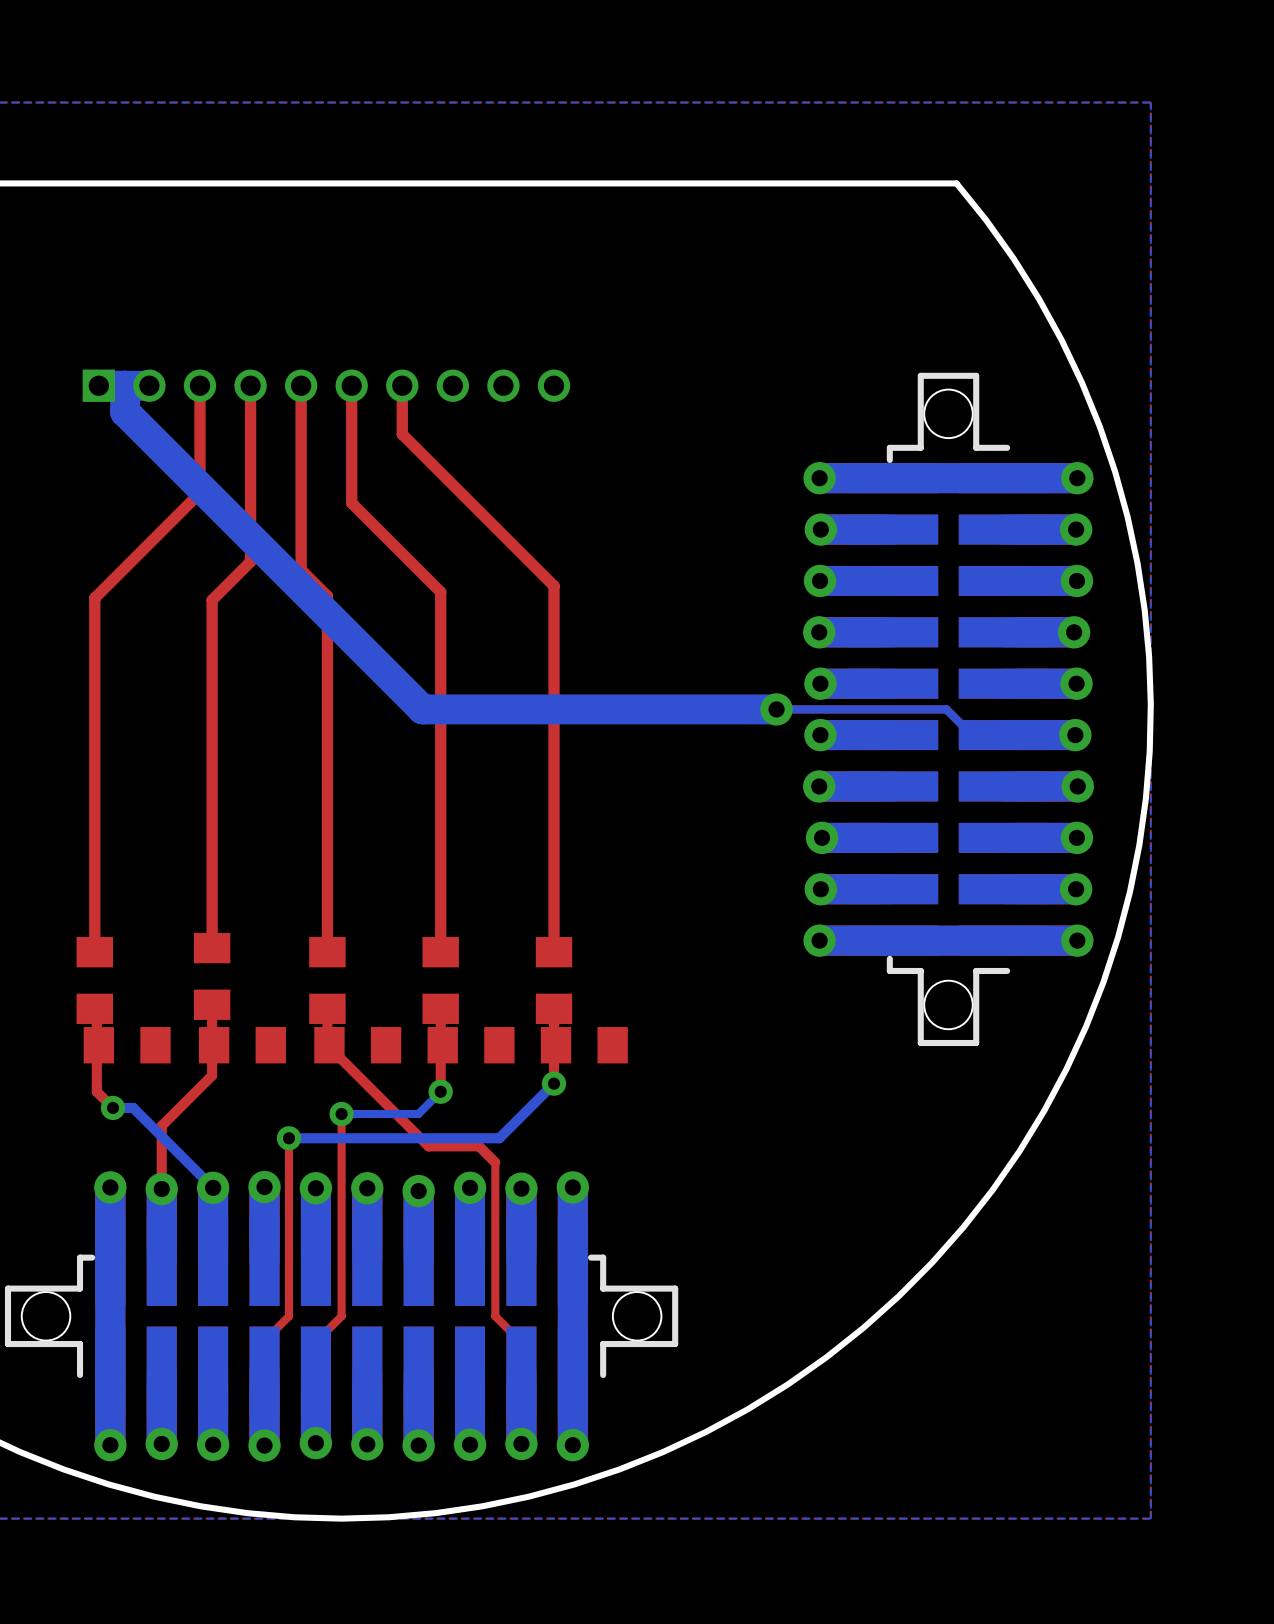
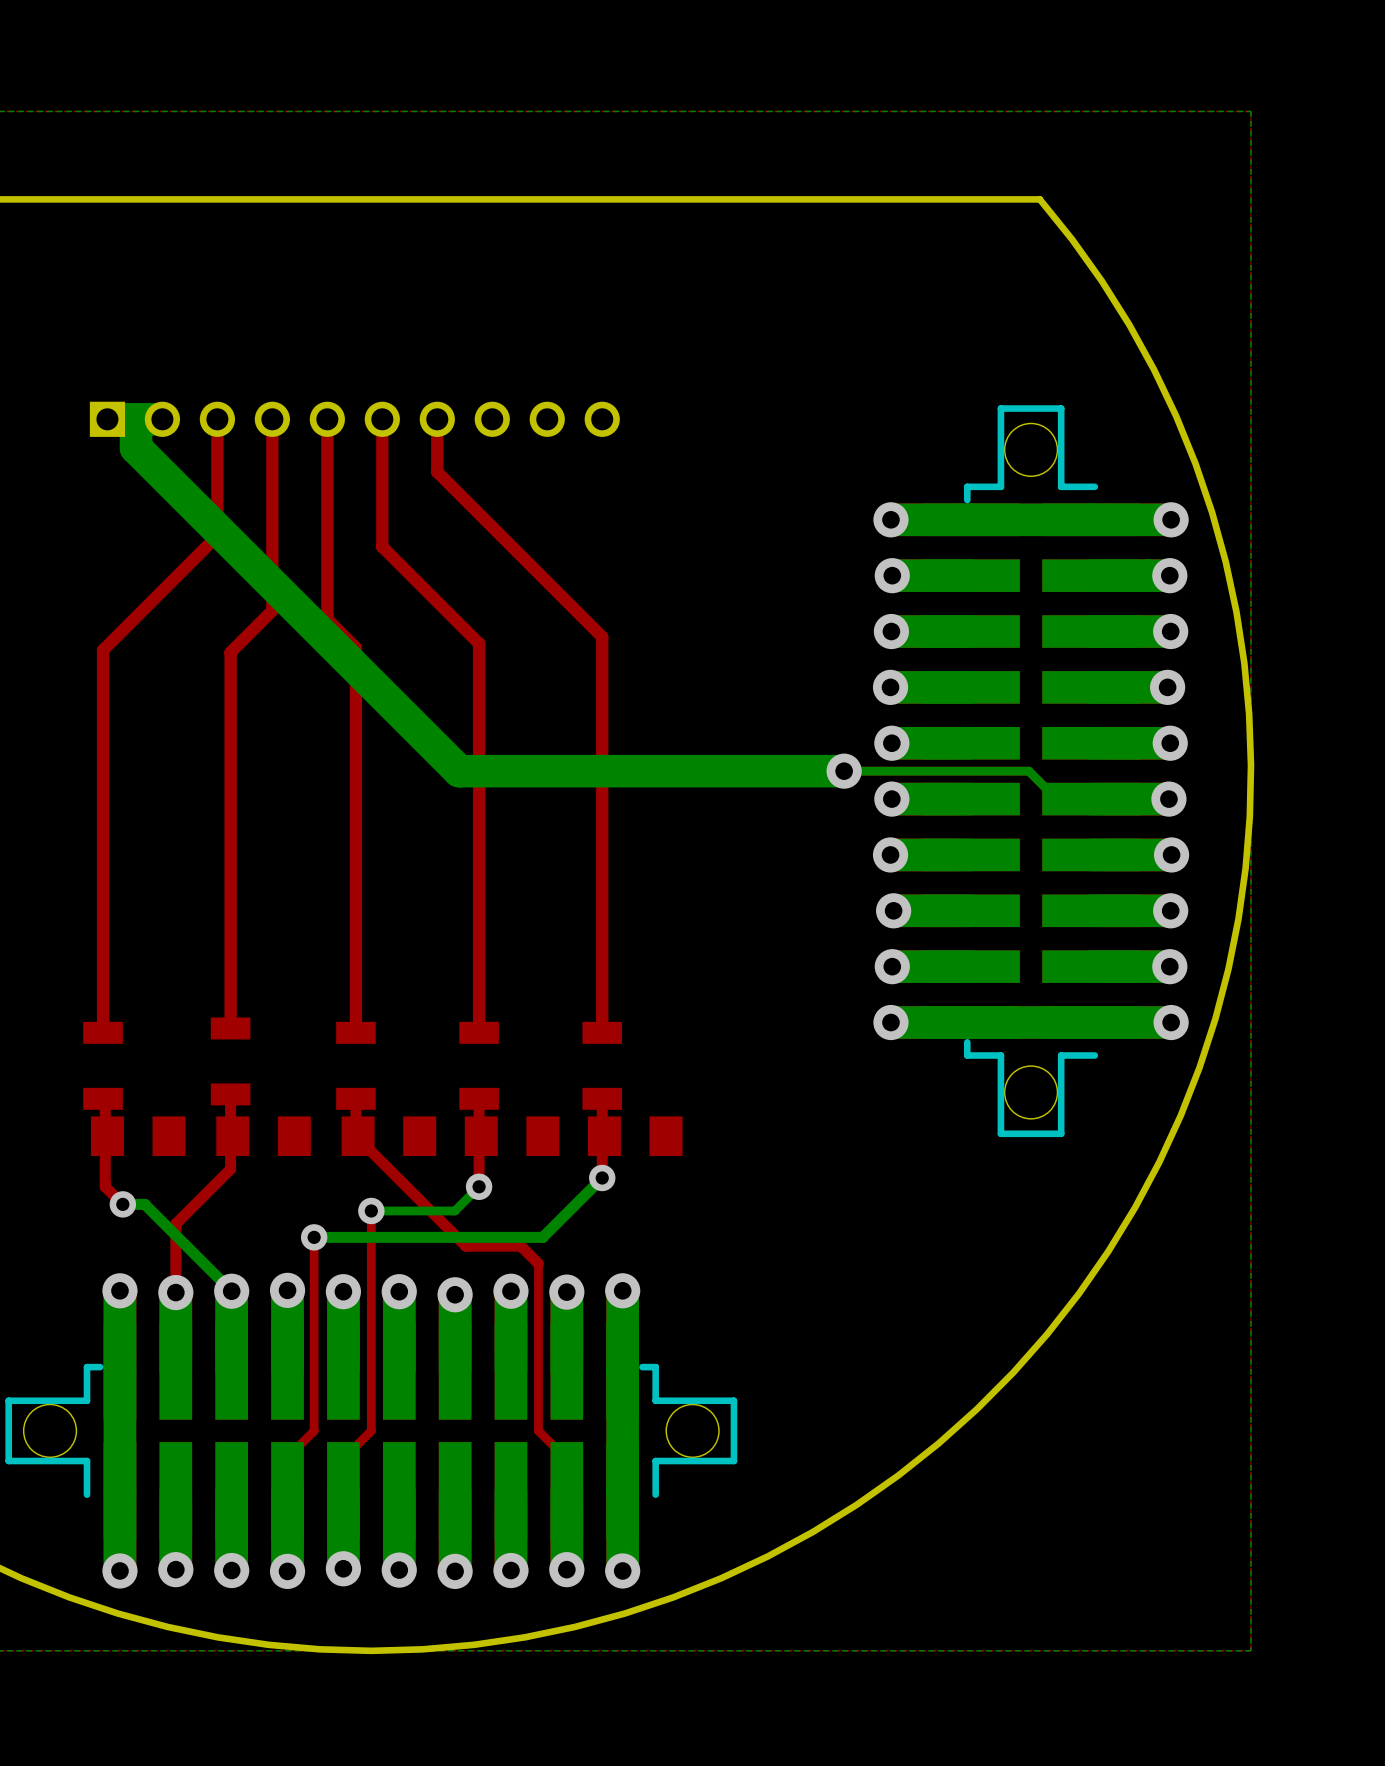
part footprint: [193, 932, 231, 1020] -> [210, 1017, 251, 1106]
part footprint: [76, 936, 114, 1024] -> [83, 1021, 123, 1110]
part footprint: [309, 936, 346, 1024] -> [336, 1021, 376, 1110]
part footprint: [422, 936, 459, 1024] -> [459, 1021, 499, 1110]
part footprint: [535, 936, 573, 1024] -> [582, 1021, 623, 1110]

